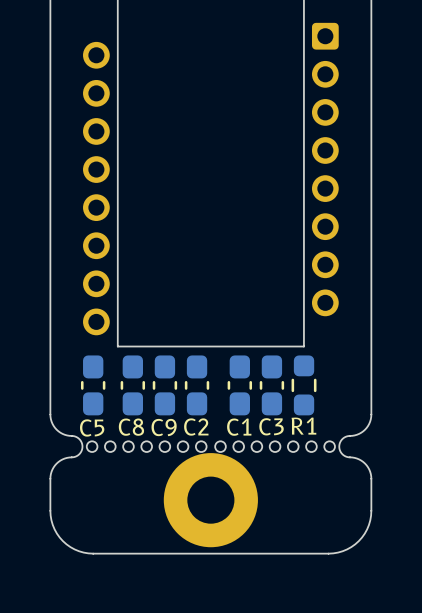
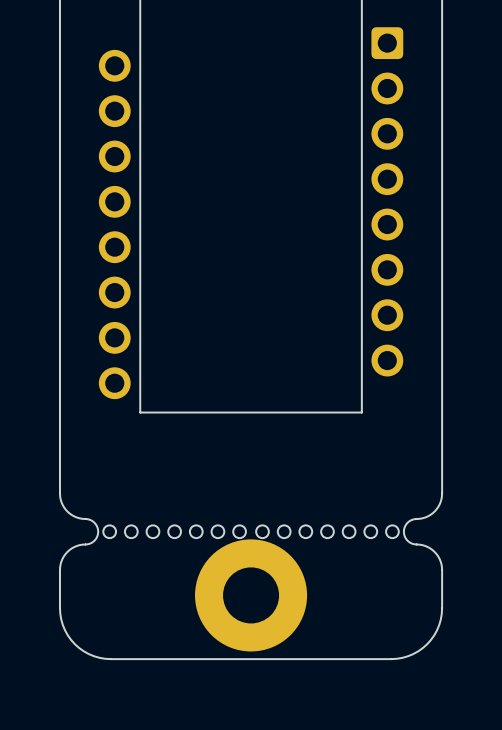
C5: (93, 385) -> none
C8: (132, 385) -> none
C9: (164, 385) -> none
C2: (197, 385) -> none
C1: (239, 385) -> none
C3: (271, 385) -> none
R1: (304, 385) -> none

